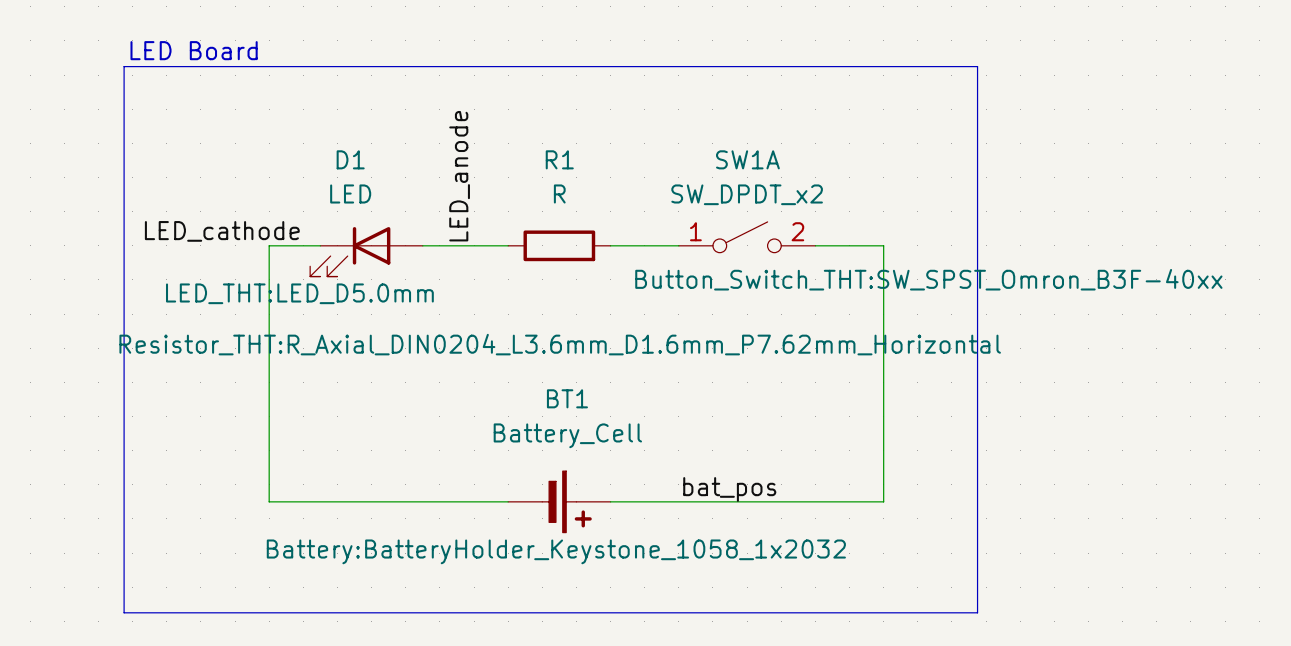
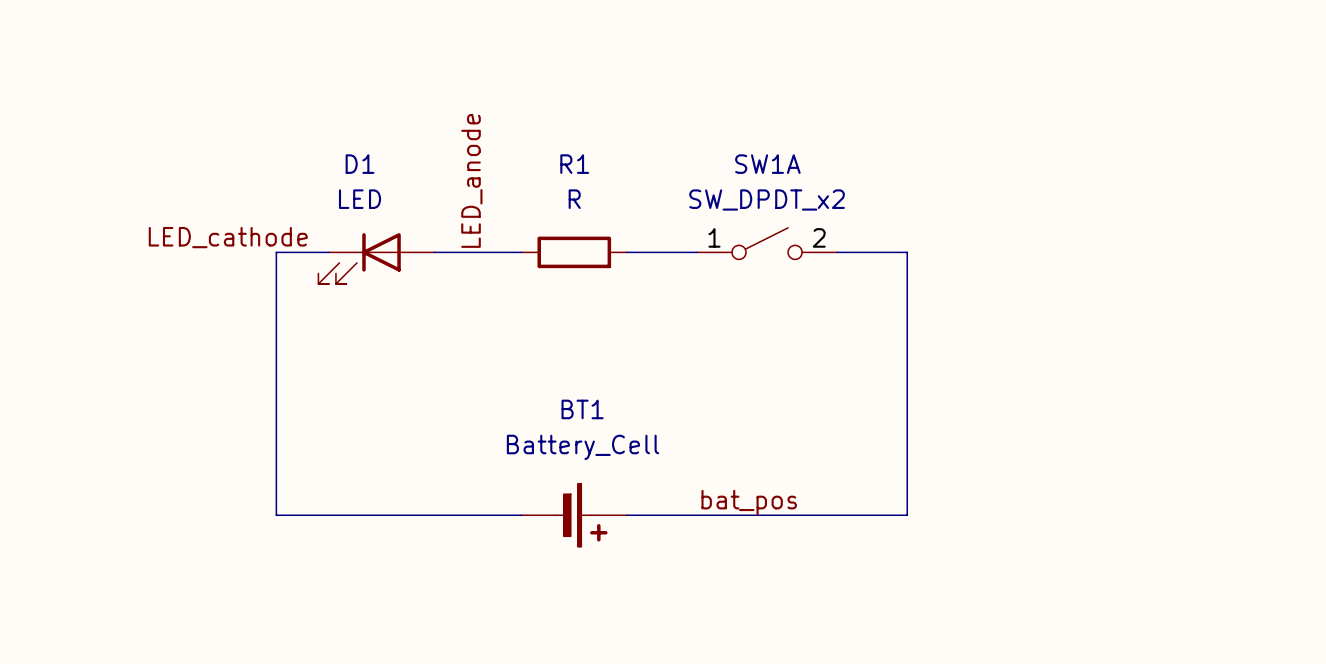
text: LED Board (194, 50) -> none
line: (124, 66) (977, 66) (977, 612) (124, 612) (124, 66) -> none
SW1A text: Button_Switch_THT:SW_SPST_Omron_B3F-40xx (928, 279) -> none
D1 text: LED_THT:LED_D5.0mm (299, 293) -> none
R1 text: Resistor_THT:R_Axial_DIN0204_L3.6mm_D1.6mm_P7.62mm_Horizontal (560, 344) -> none
BT1 text: Battery:BatteryHolder_Keystone_1058_1x2032 (556, 551) -> none

